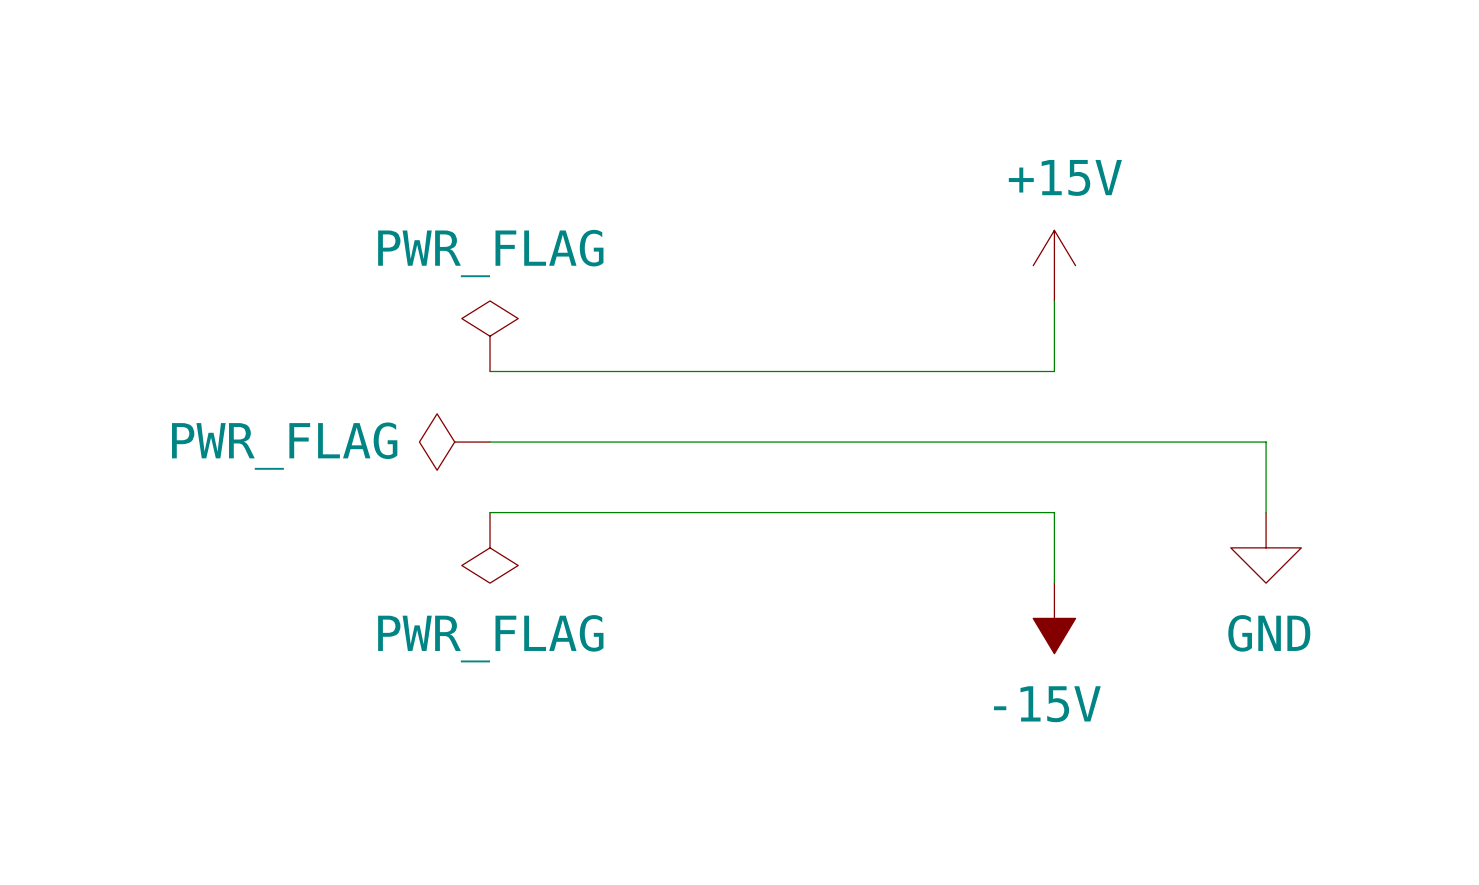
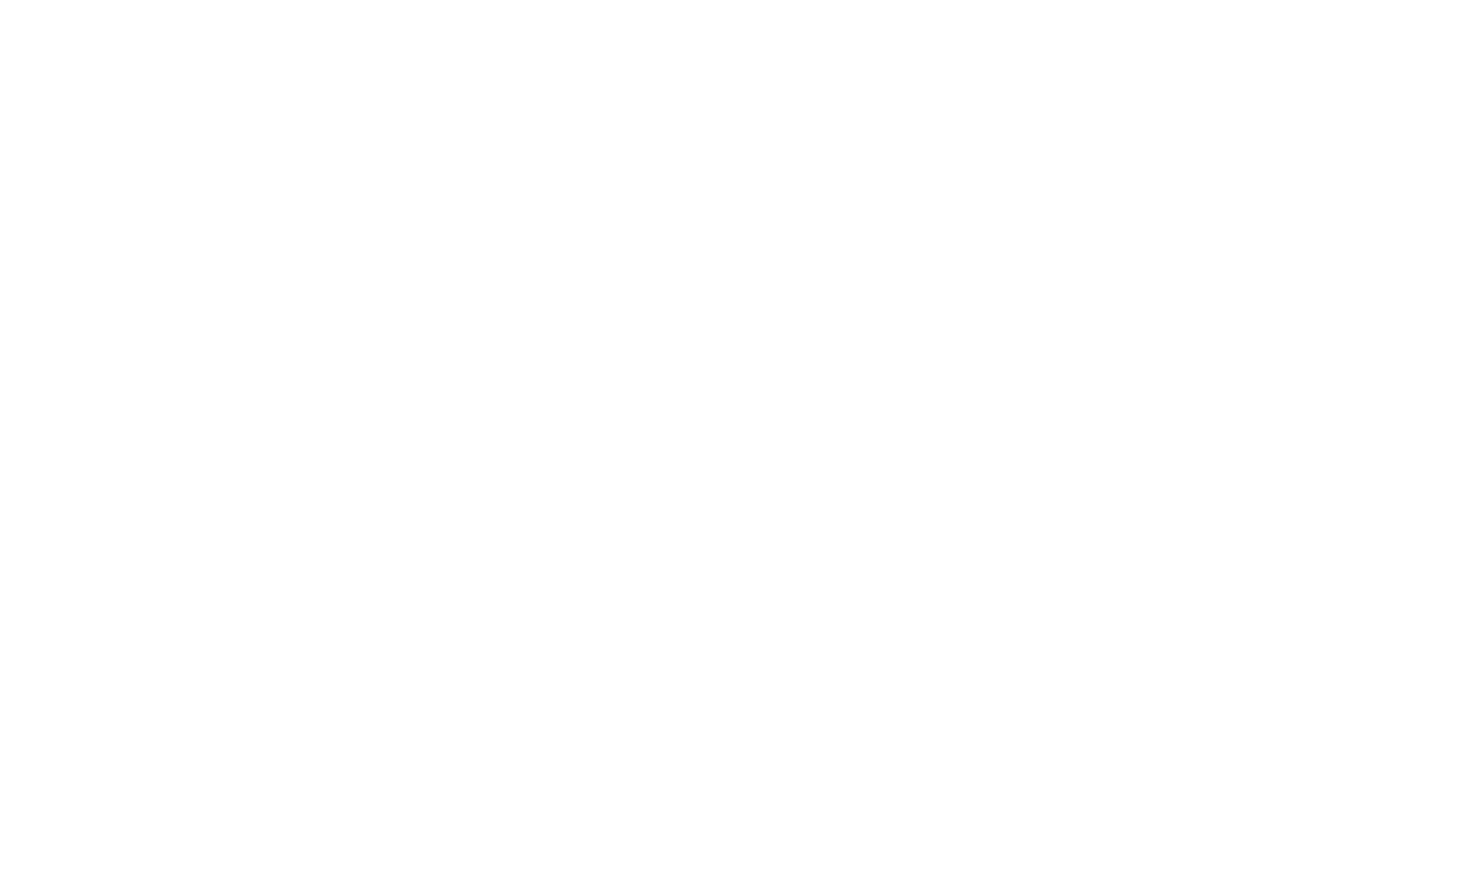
power symbol: +15V (1054, 265) -> none
wire: (1054, 300) (1054, 371) (490, 371) -> none
power symbol: PWR_FLAG (490, 336) -> none
power symbol: PWR_FLAG (454, 442) -> none
wire: (490, 442) (1266, 442) (1266, 512) -> none
wire: (490, 512) (1054, 512) (1054, 583) -> none
power symbol: PWR_FLAG (490, 547) -> none
power symbol: GND (1266, 547) -> none
power symbol: -15V (1054, 618) -> none

